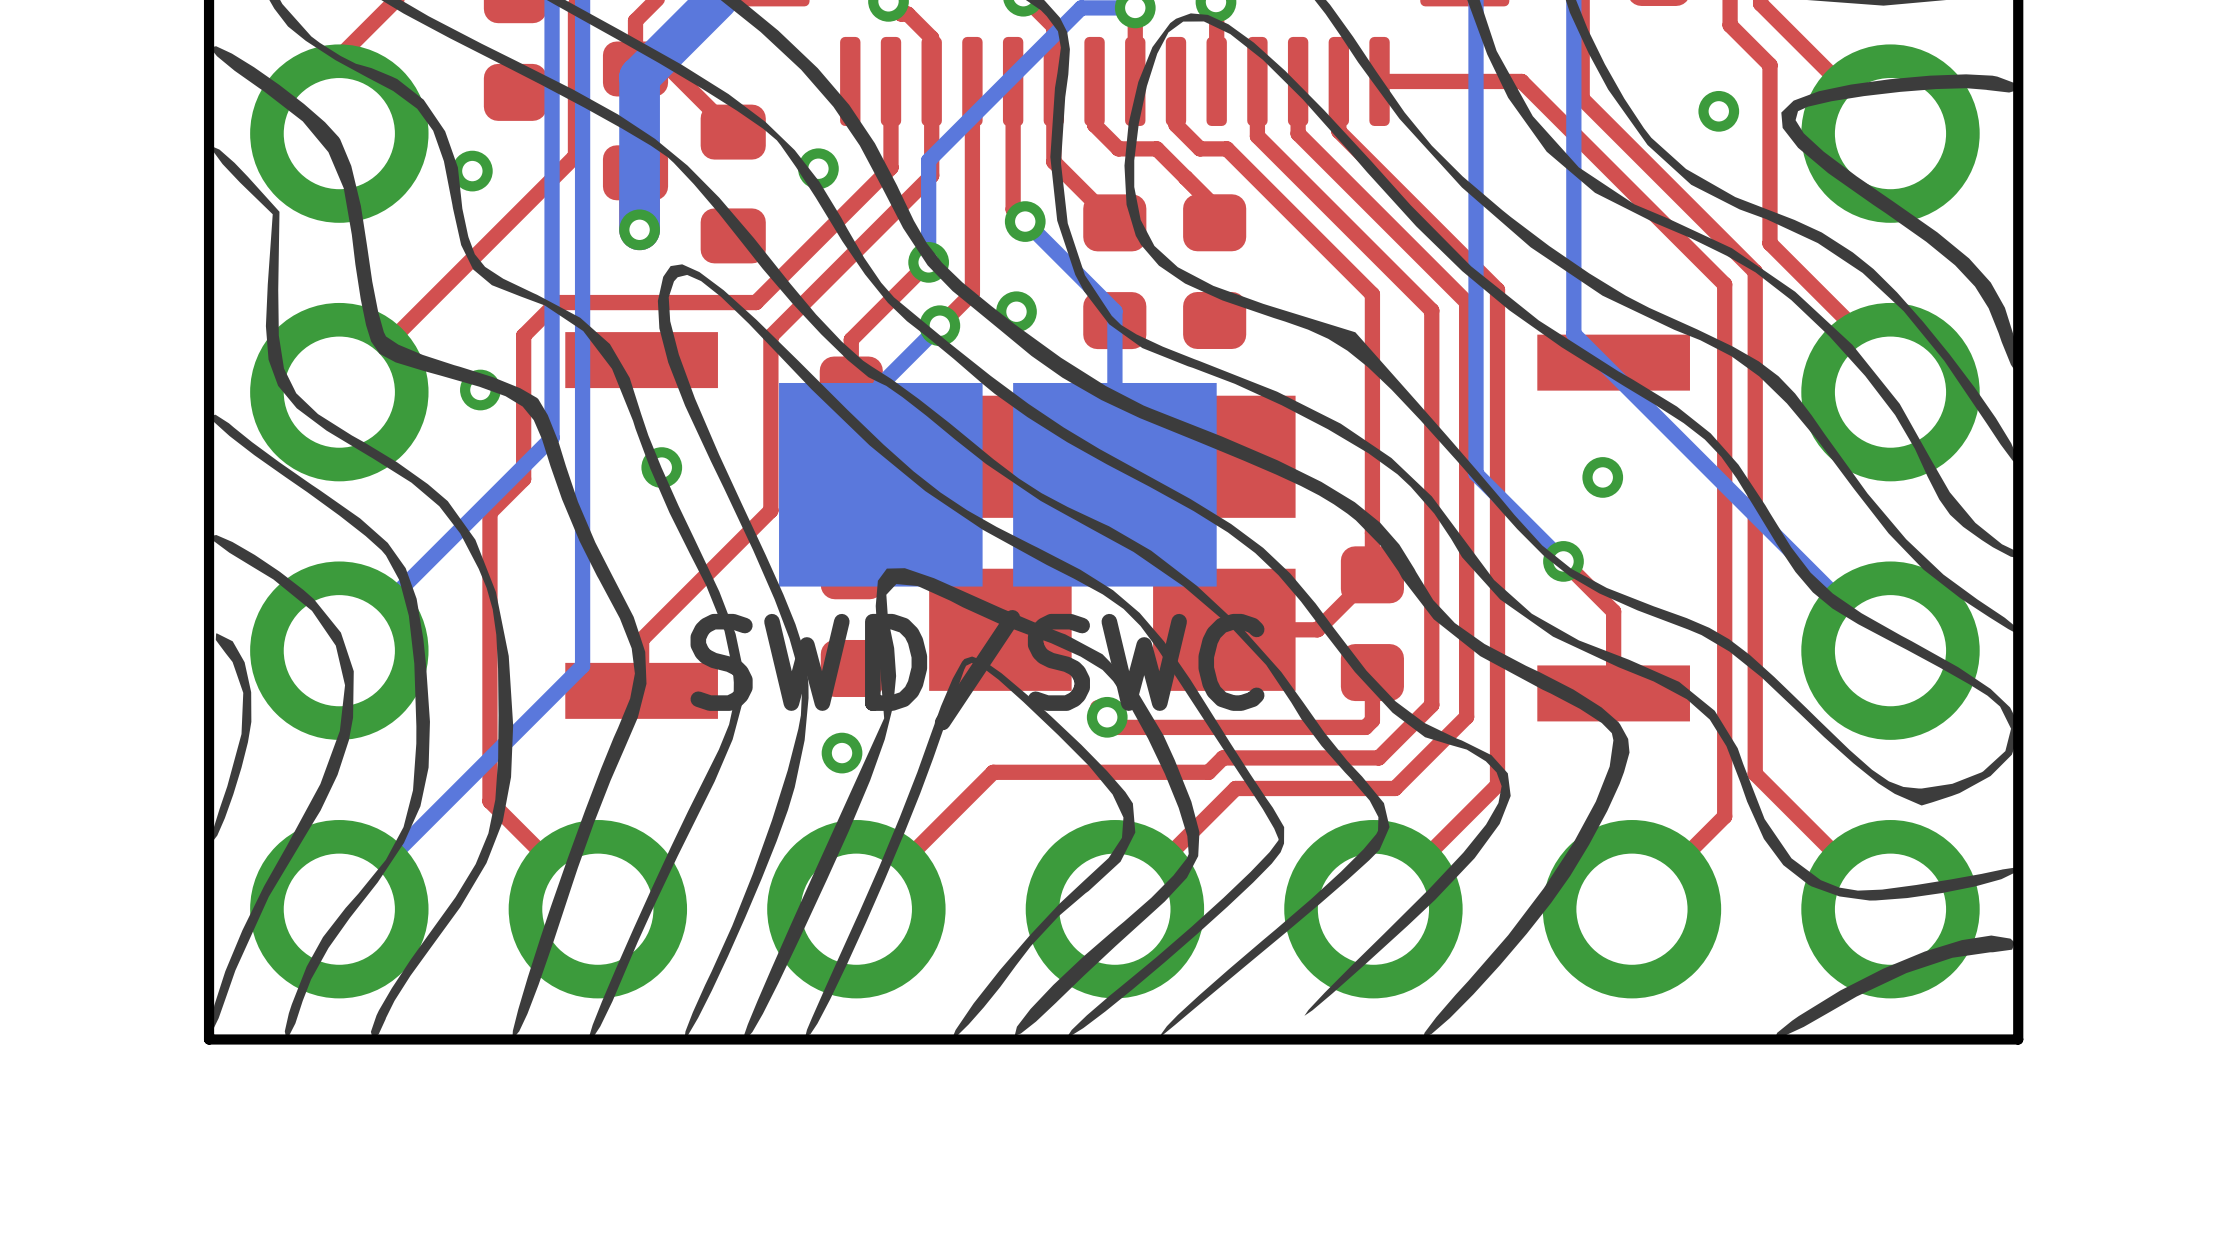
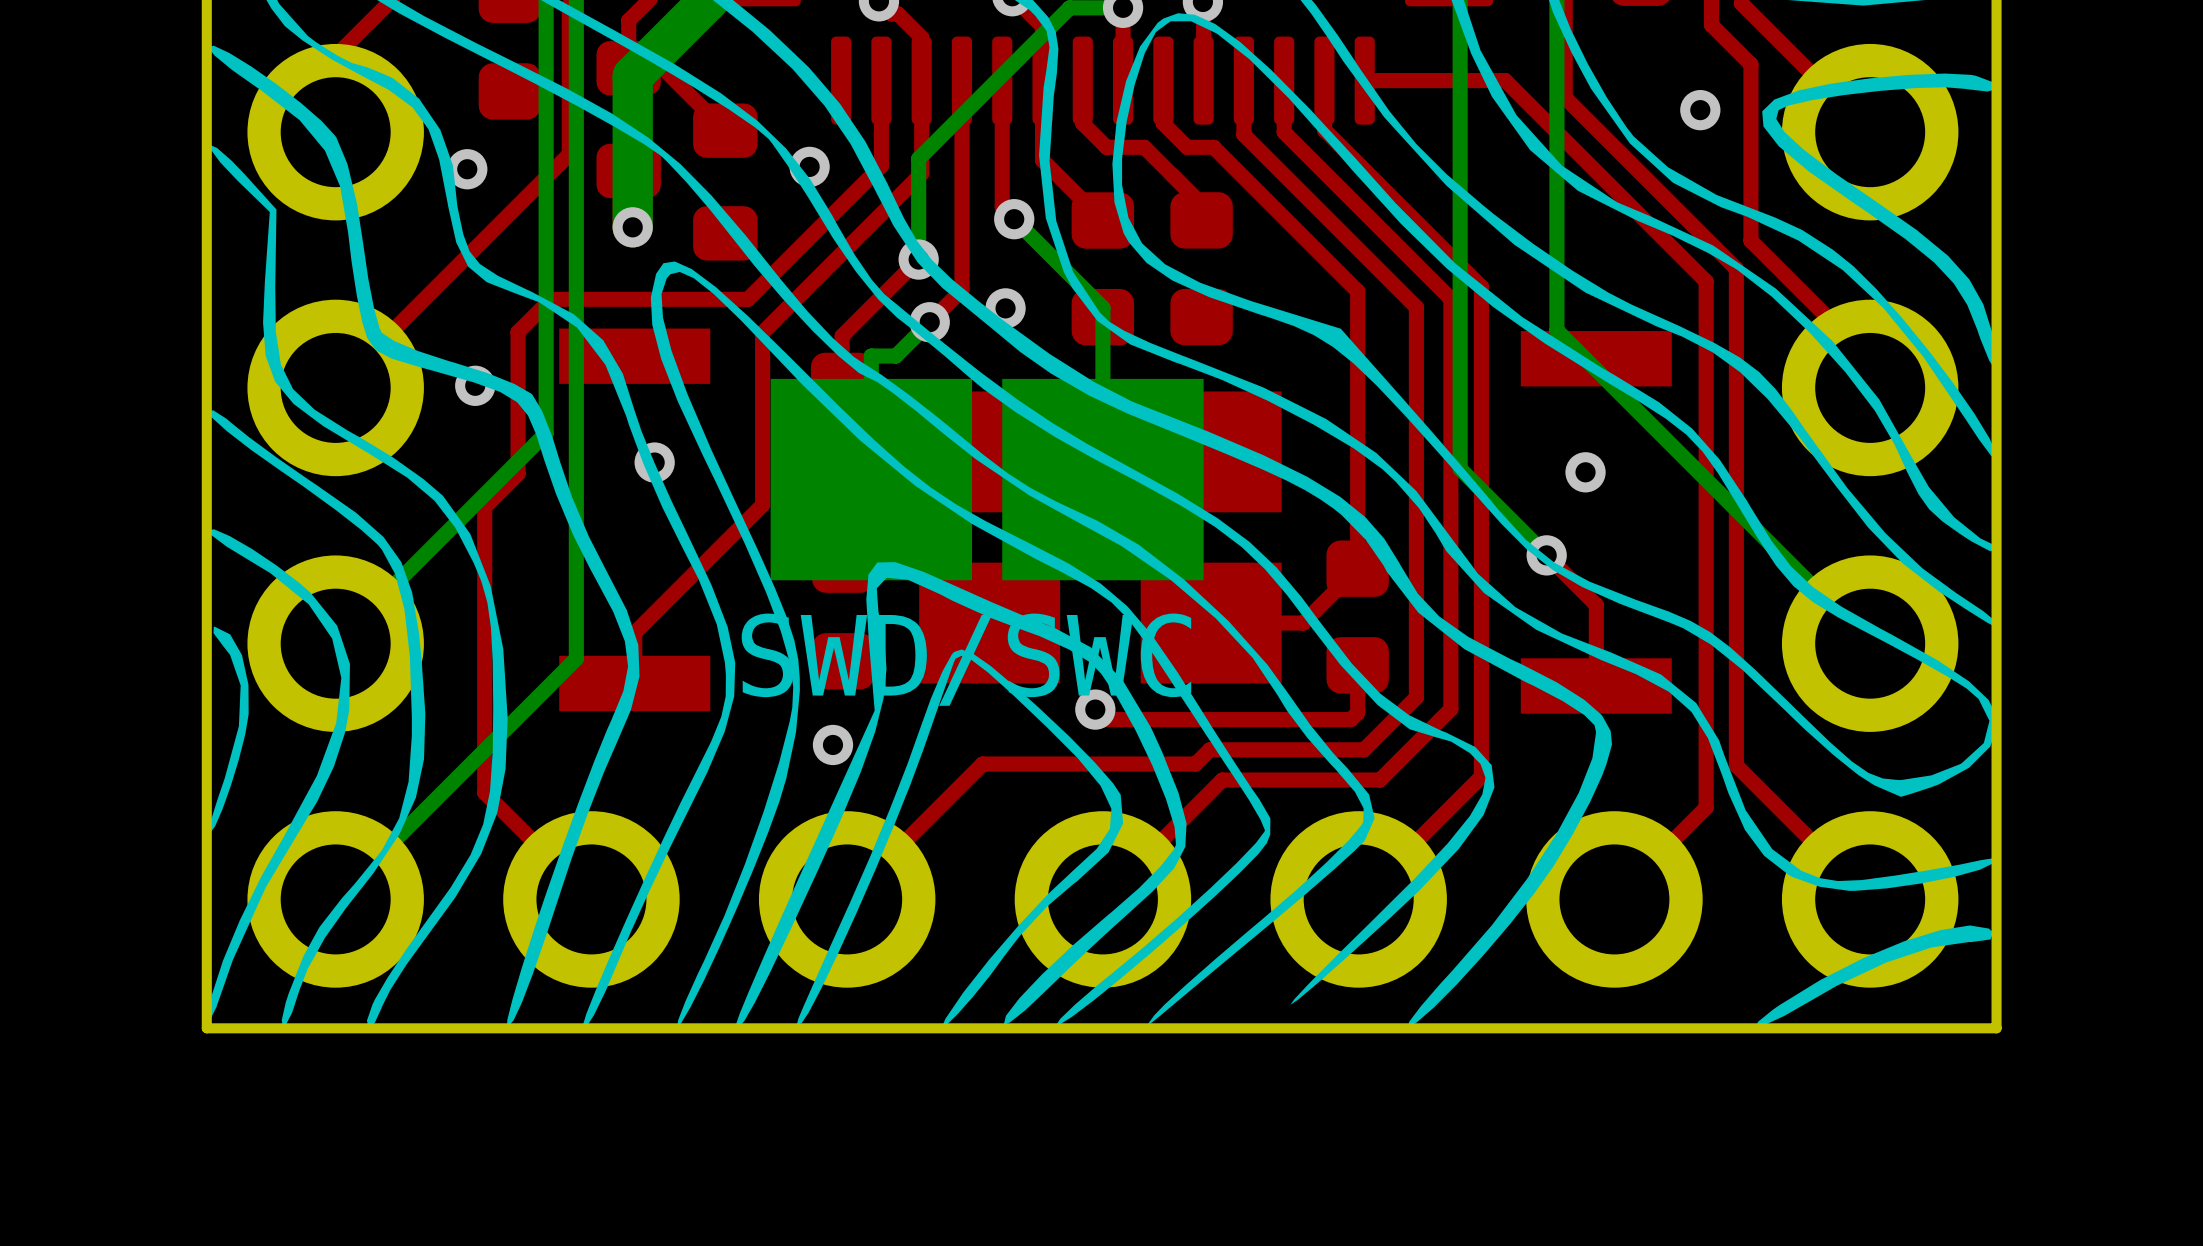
bottom track: (905, 359) (880, 384) -> (895, 356) (871, 356) (871, 380)

